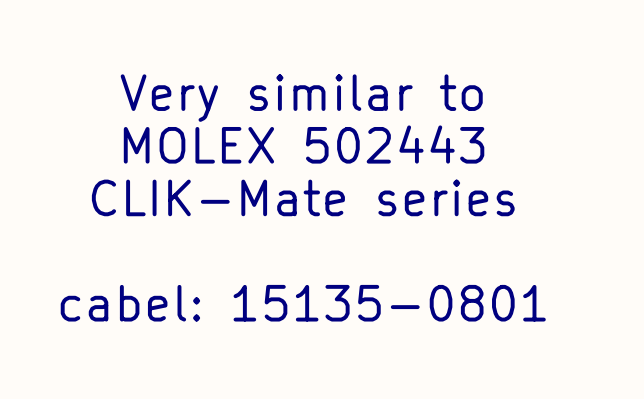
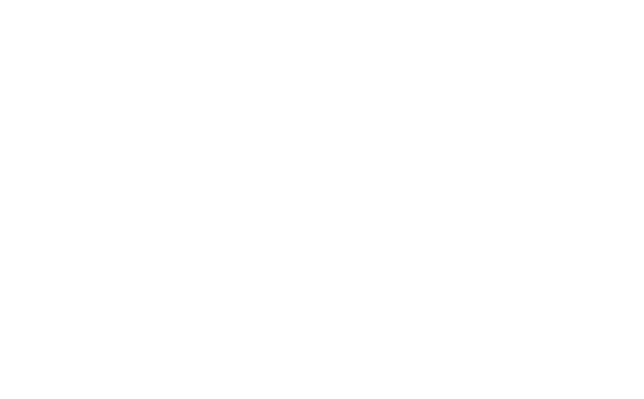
text: Very similar to (301, 98) -> none
text: MOLEX 502443 (304, 144) -> none
text: CLIK-Mate series (303, 197) -> none
text: cabel: 15135-0801 (303, 303) -> none

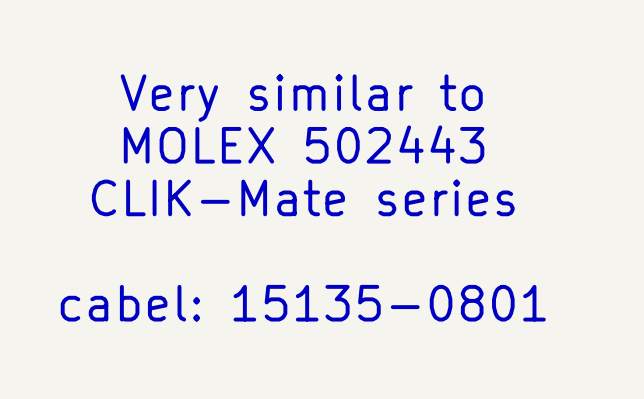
text: none -> Very similar to (301, 98)
text: none -> MOLEX 502443 (304, 144)
text: none -> CLIK-Mate series (303, 197)
text: none -> cabel: 15135-0801 (303, 303)

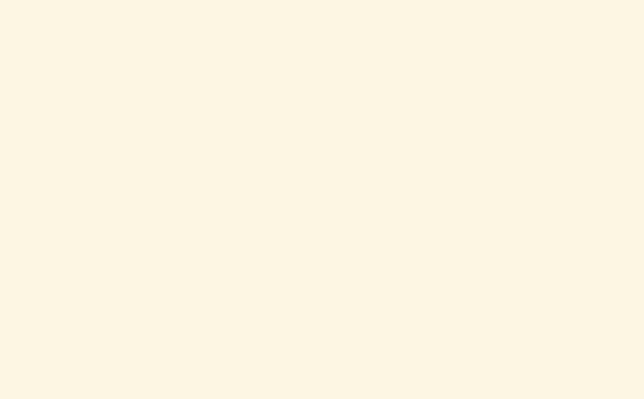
text: Very similar to (301, 98) -> none
text: MOLEX 502443 (304, 144) -> none
text: CLIK-Mate series (303, 197) -> none
text: cabel: 15135-0801 (303, 303) -> none

